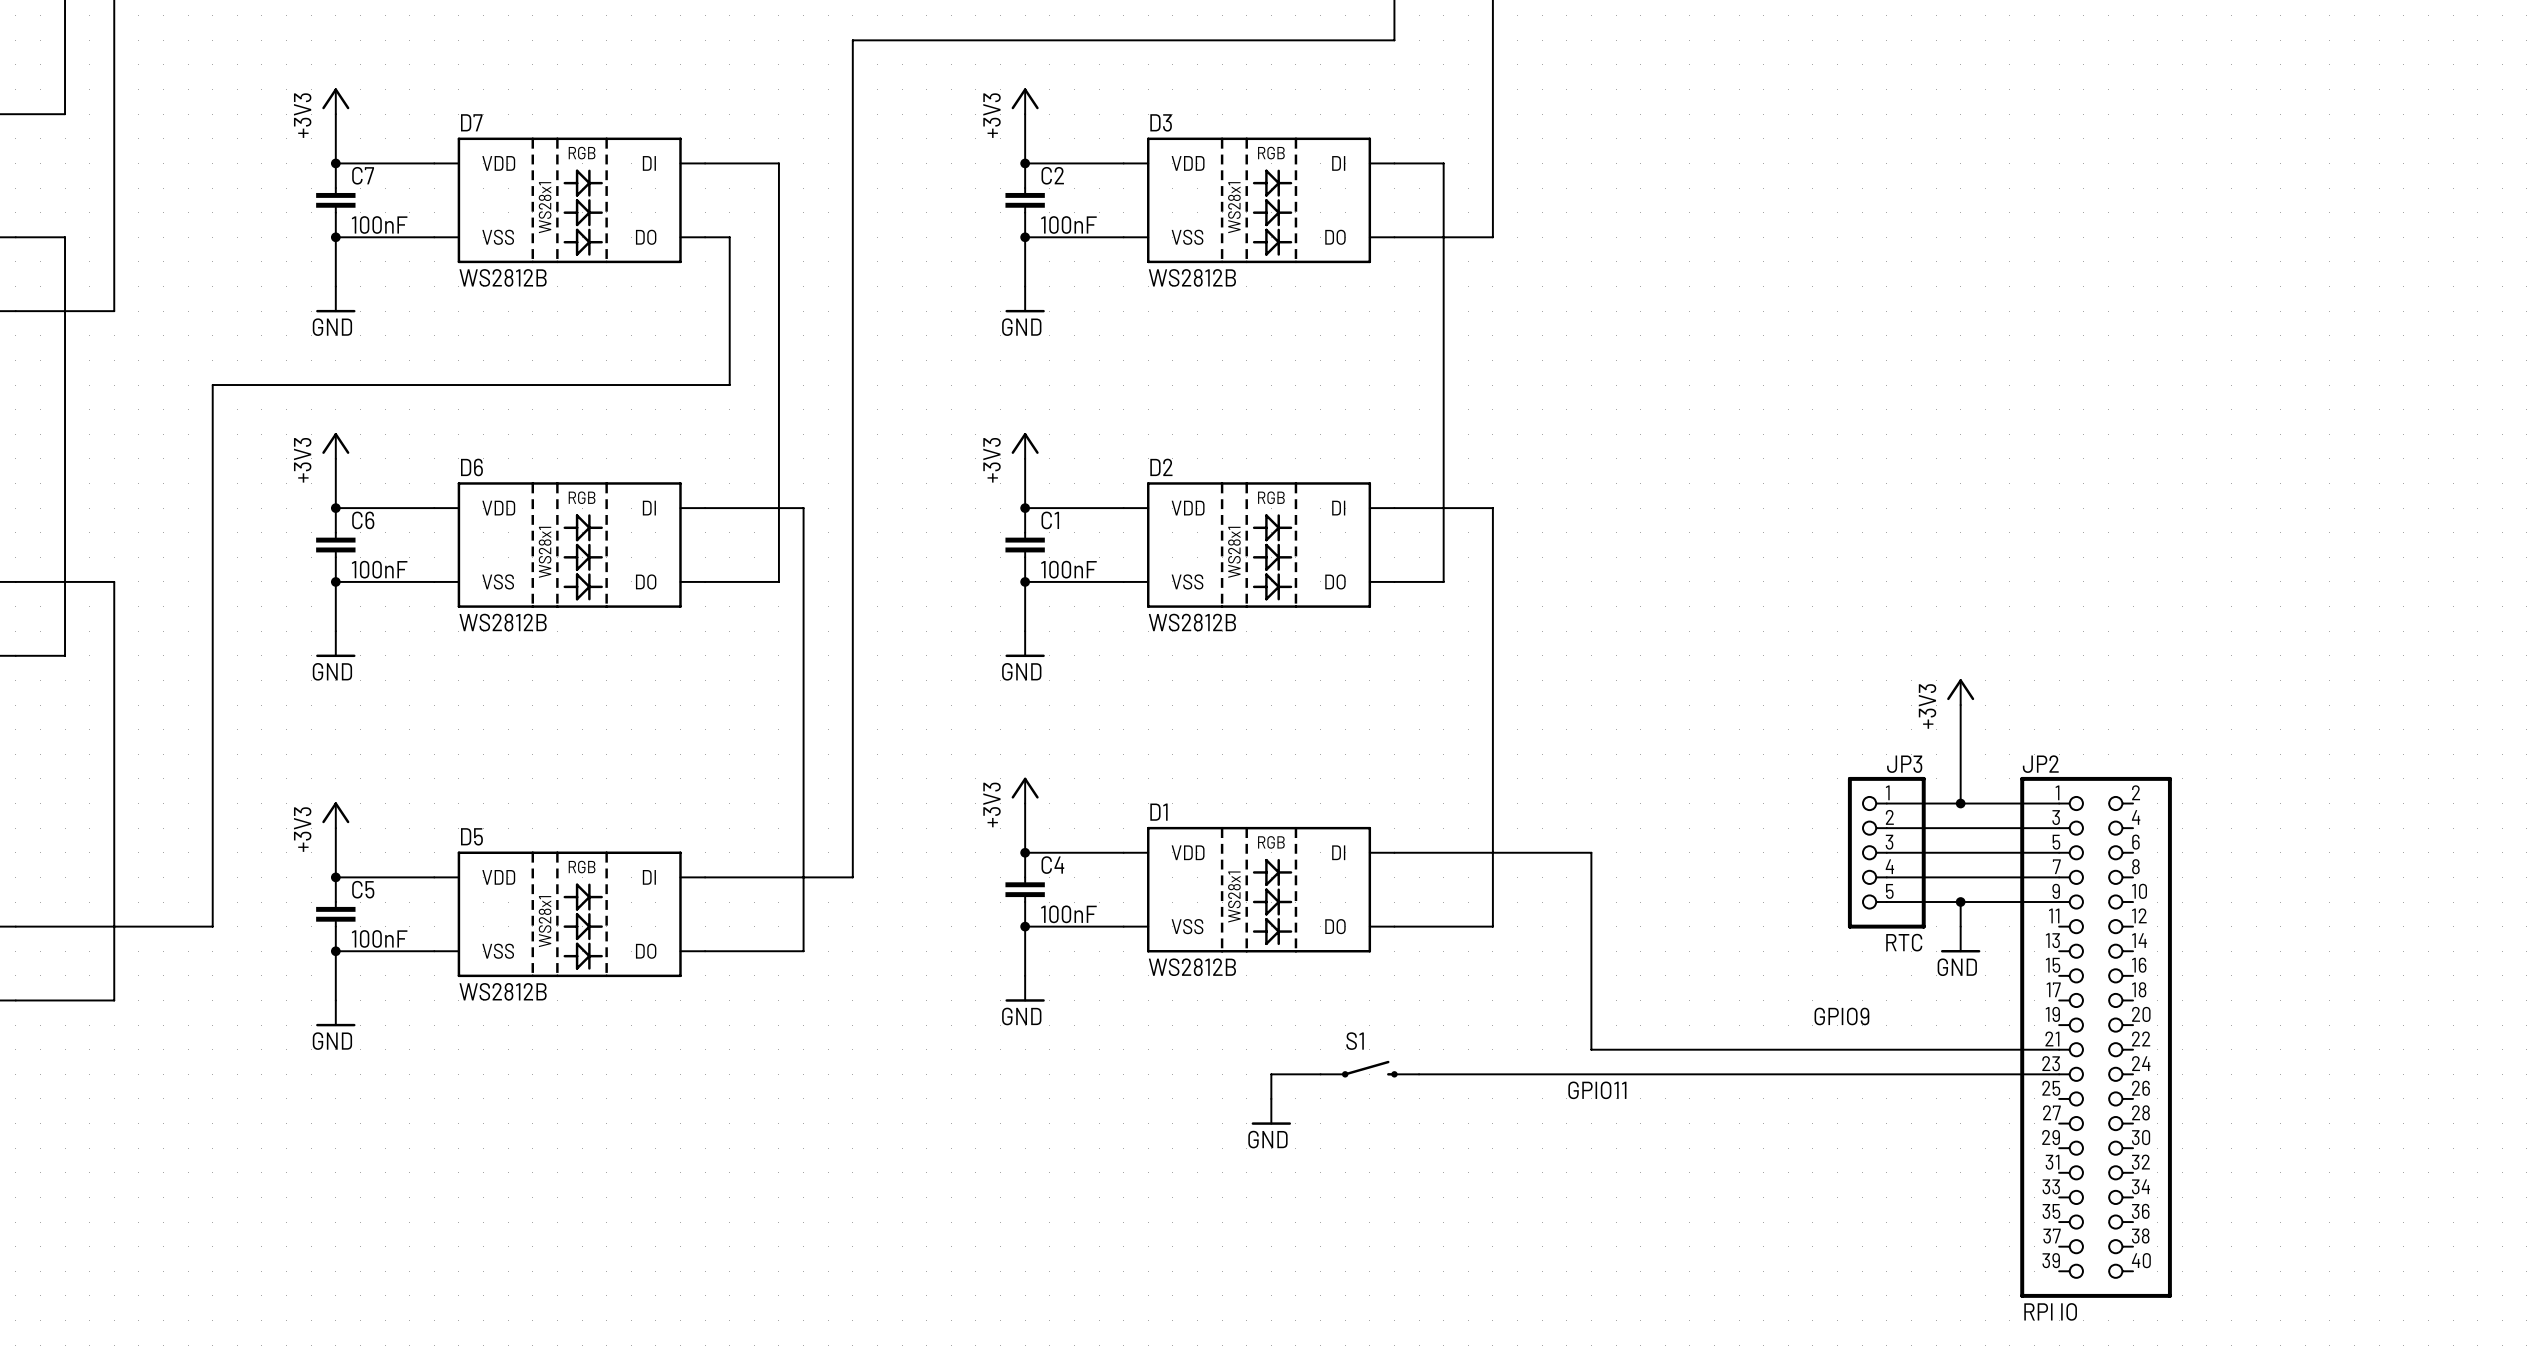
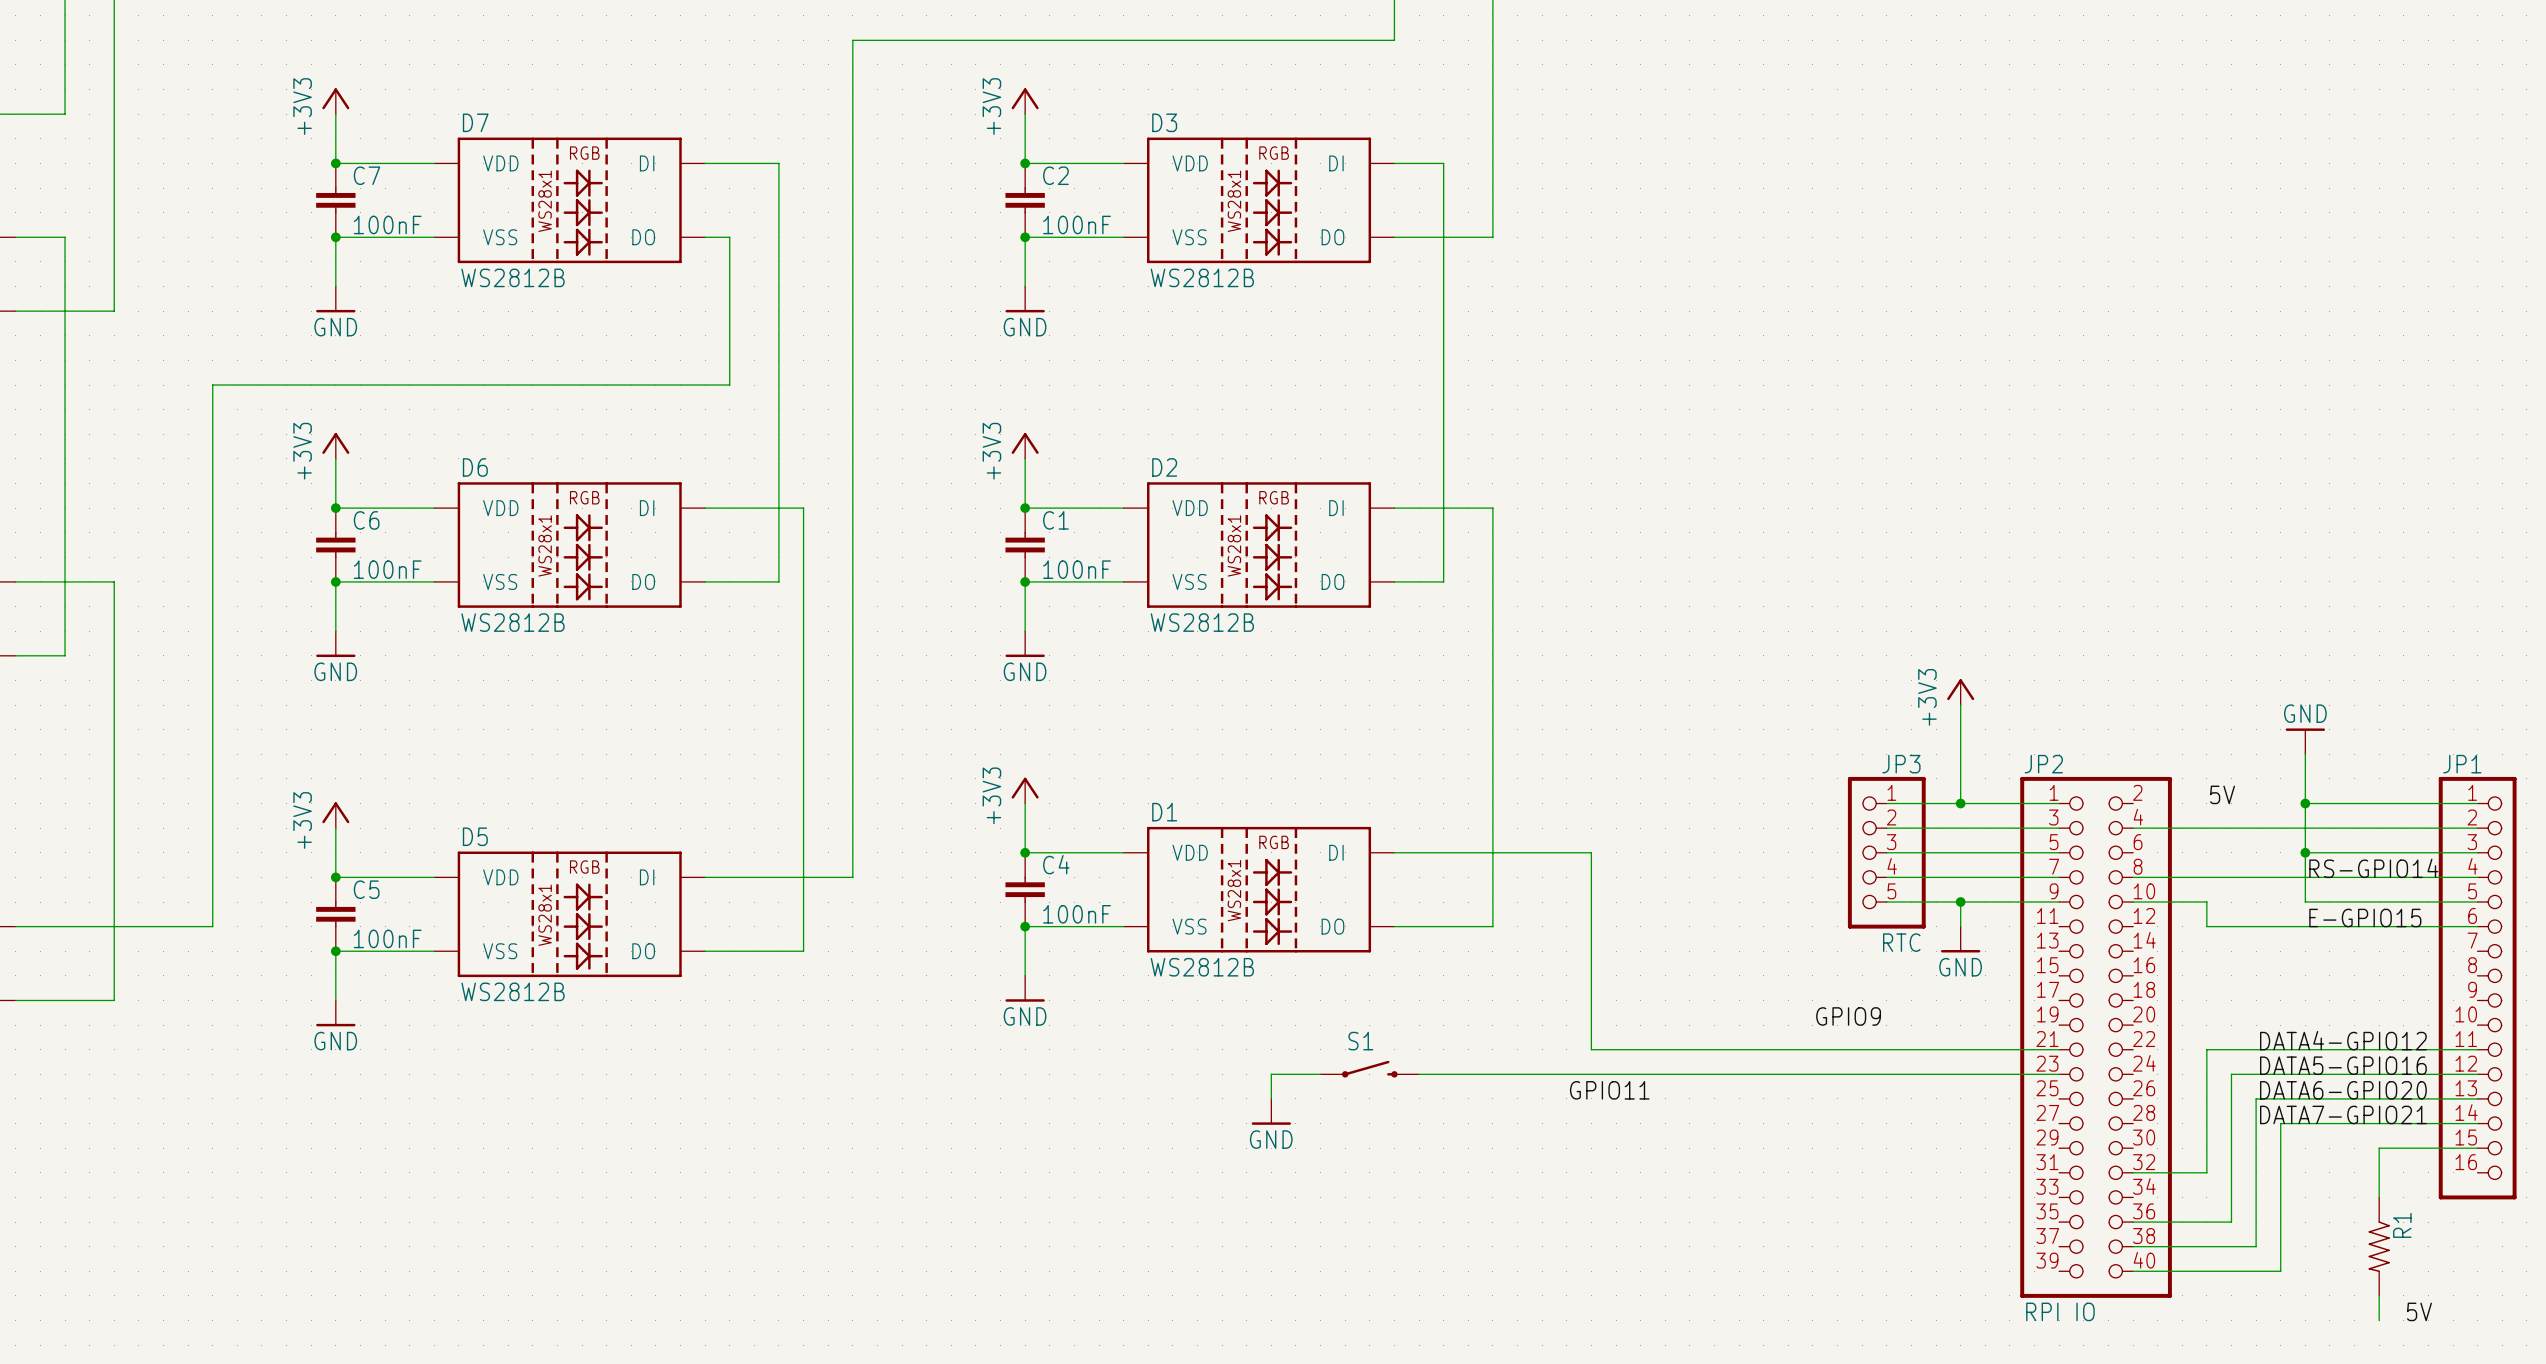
power symbol: none -> GND (2305, 741)
wire: none -> (2305, 754) (2305, 902) (2477, 902)
label: none -> 5V (2222, 794)
wire: none -> (2305, 803) (2477, 803)
junction: none -> (2305, 803)
wire: none -> (2133, 828) (2477, 828)
wire: none -> (2305, 852) (2477, 852)
junction: none -> (2305, 852)
label: none -> RS-GPIO14 (2373, 868)
wire: none -> (2133, 877) (2477, 877)
wire: none -> (2133, 902) (2206, 902) (2206, 926) (2477, 926)
label: none -> E-GPIO15 (2365, 918)
JP1: none -> (2477, 988)
label: none -> DATA4-GPIO12 (2343, 1040)
wire: none -> (2477, 1049) (2206, 1049) (2206, 1172) (2133, 1172)
label: none -> DATA5-GPIO16 (2343, 1065)
wire: none -> (2477, 1074) (2231, 1074) (2231, 1222) (2133, 1222)
label: none -> DATA6-GPIO20 (2343, 1090)
wire: none -> (2477, 1098) (2256, 1098) (2256, 1246) (2133, 1246)
label: none -> DATA7-GPIO21 (2343, 1114)
wire: none -> (2477, 1123) (2280, 1123) (2280, 1271) (2133, 1271)
wire: none -> (2477, 1148) (2379, 1148) (2379, 1197)
R1: none -> (2379, 1246)
wire: none -> (2379, 1295) (2379, 1320)
label: none -> 5V (2419, 1311)

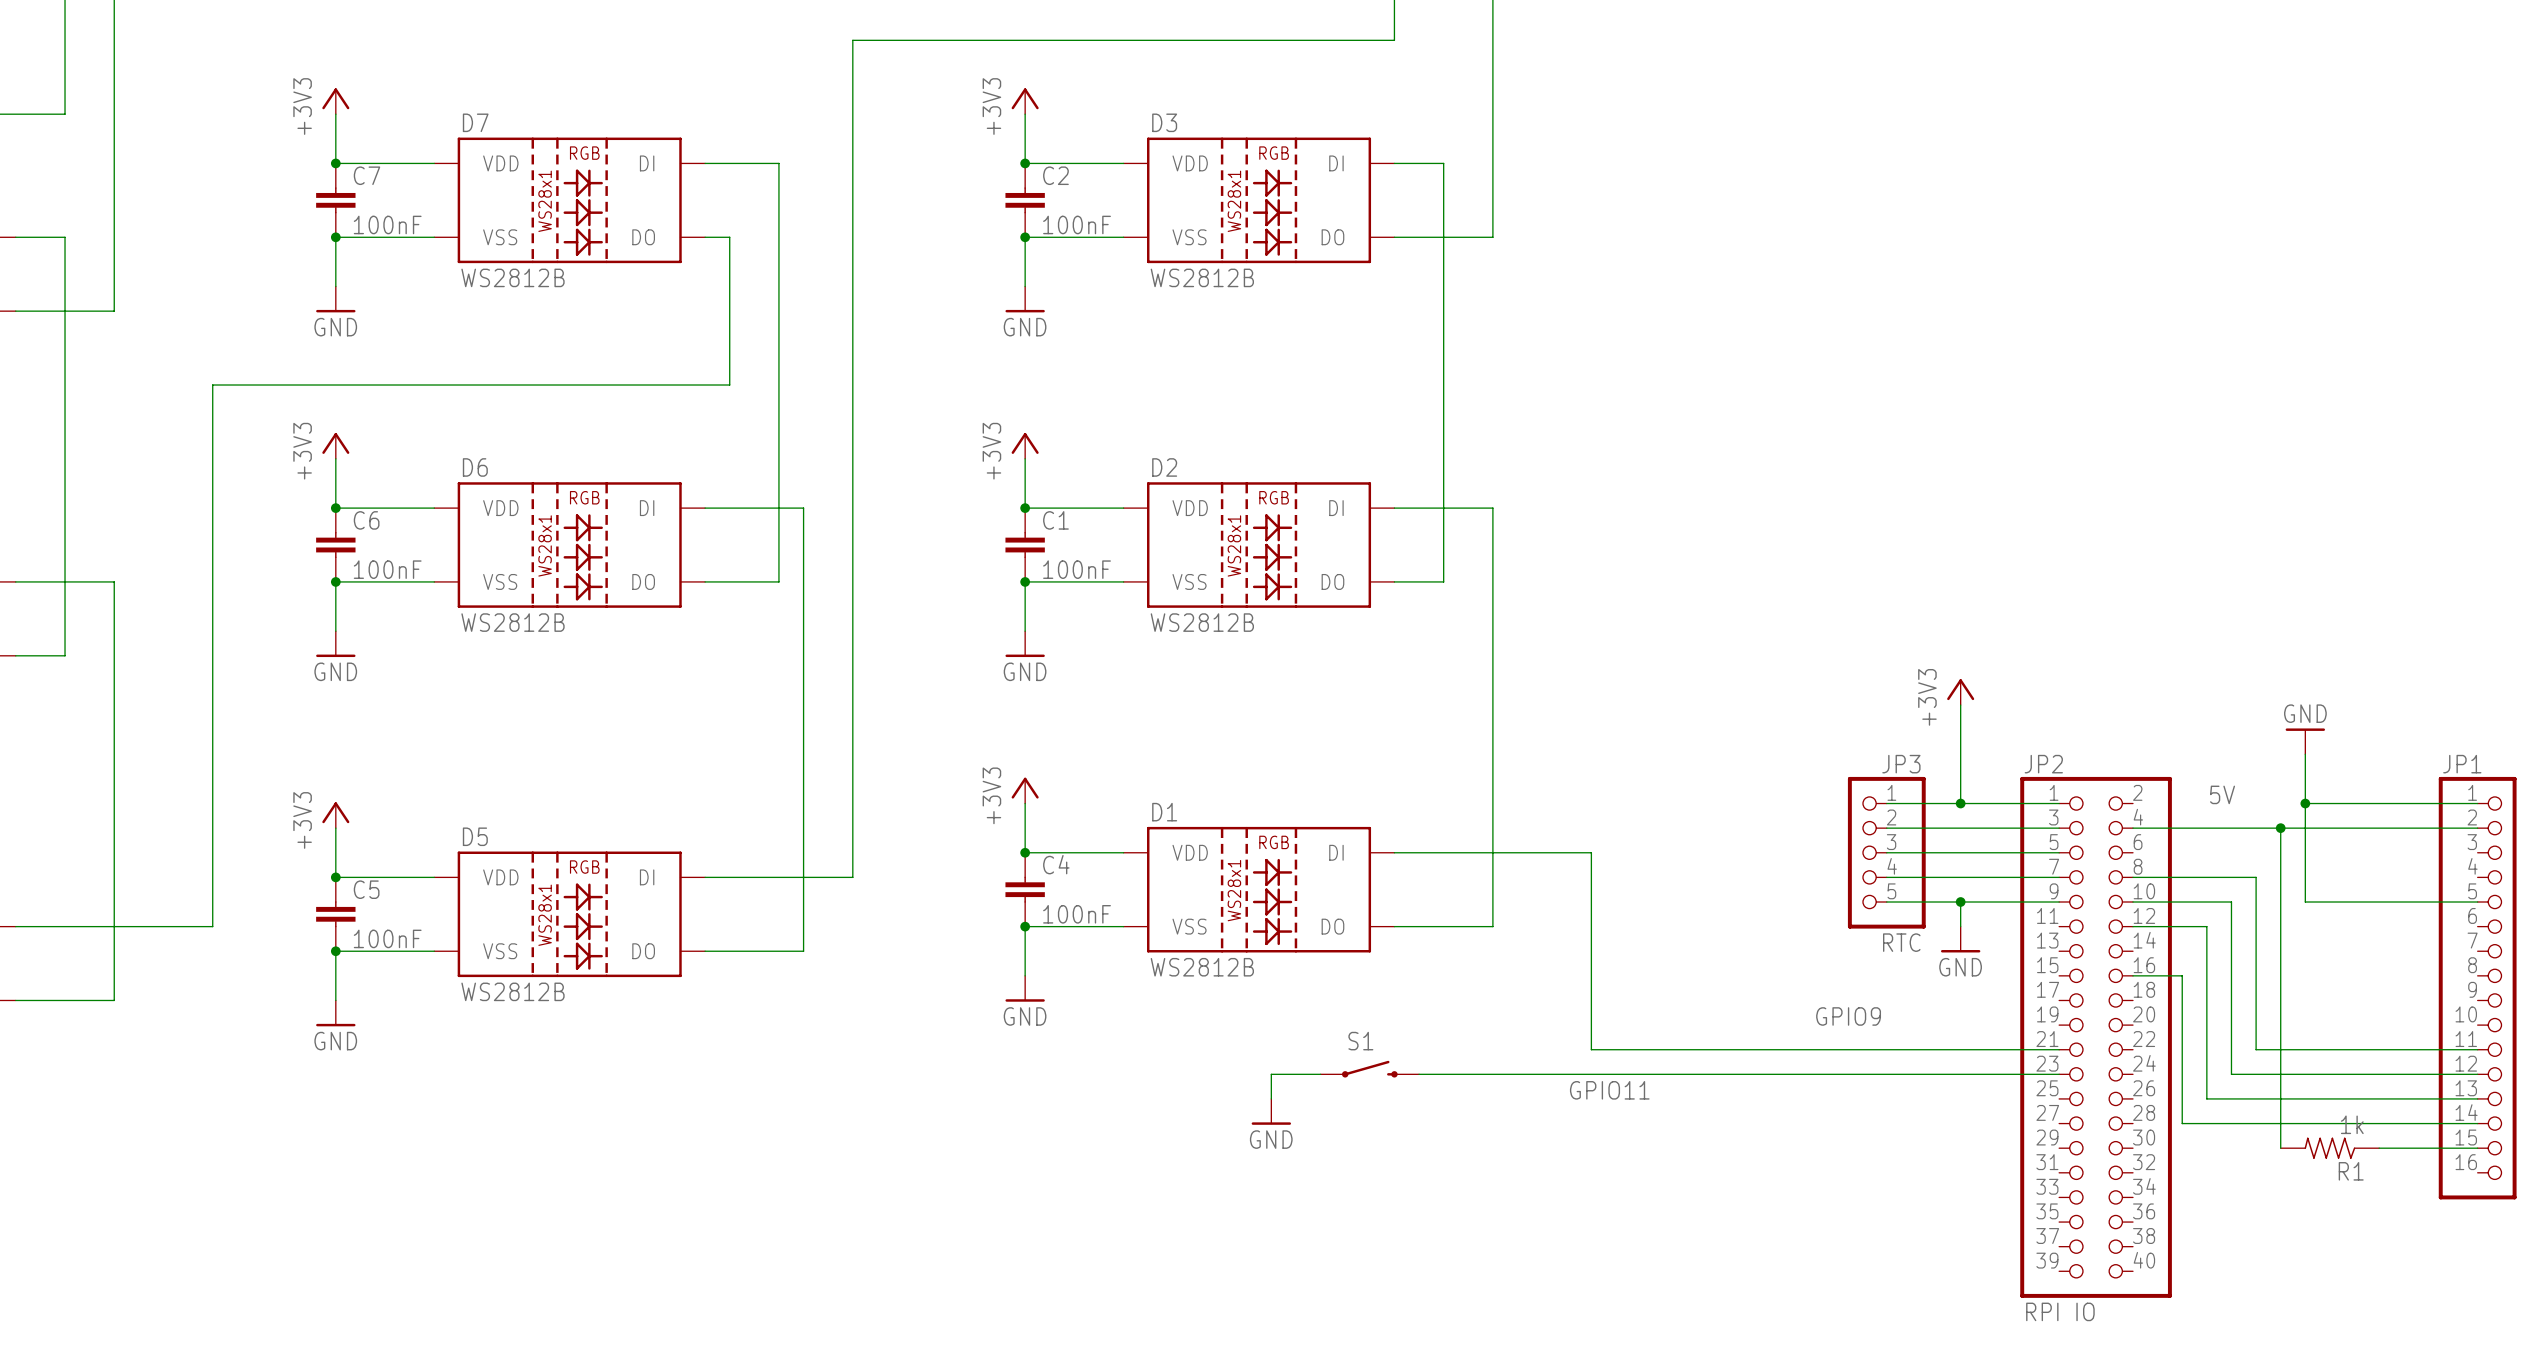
wire: none -> (2280, 828) (2280, 1123) (2182, 1123) (2182, 975) (2133, 975)
wire: (2305, 852) (2477, 852) -> none
junction position: (2305, 852) -> (2280, 828)
label: RS-GPIO14 (2373, 868) -> none
wire: (2256, 877) (2477, 877) -> (2256, 877) (2256, 1049)
wire: (2206, 902) (2206, 926) (2477, 926) -> (2206, 902) (2231, 902) (2231, 1074)
label: E-GPIO15 (2365, 918) -> none
label: DATA4-GPIO12 (2343, 1040) -> none
wire: (2206, 1049) (2256, 1049) -> (2206, 1049) (2206, 926) (2133, 926)
label: DATA5-GPIO16 (2343, 1065) -> none
wire: (2231, 1074) (2231, 1222) (2133, 1222) -> none
label: DATA6-GPIO20 (2343, 1090) -> none
wire: (2206, 1098) (2206, 1172) (2133, 1172) -> (2206, 1098) (2256, 1098)
wire: (2256, 1098) (2256, 1246) (2133, 1246) -> none
label: DATA7-GPIO21 (2343, 1114) -> none
R1 value: none -> 1k (2352, 1124)
wire: (2280, 1148) (2280, 1271) (2133, 1271) -> none
wire: (2379, 1148) (2379, 1197) -> none
R1 rotation: 0° (2379, 1246) -> 90° clockwise (2329, 1148)
R1 position: (2379, 1246) -> (2329, 1148)
wire: (2379, 1295) (2379, 1320) -> none
label: 5V (2419, 1311) -> none

